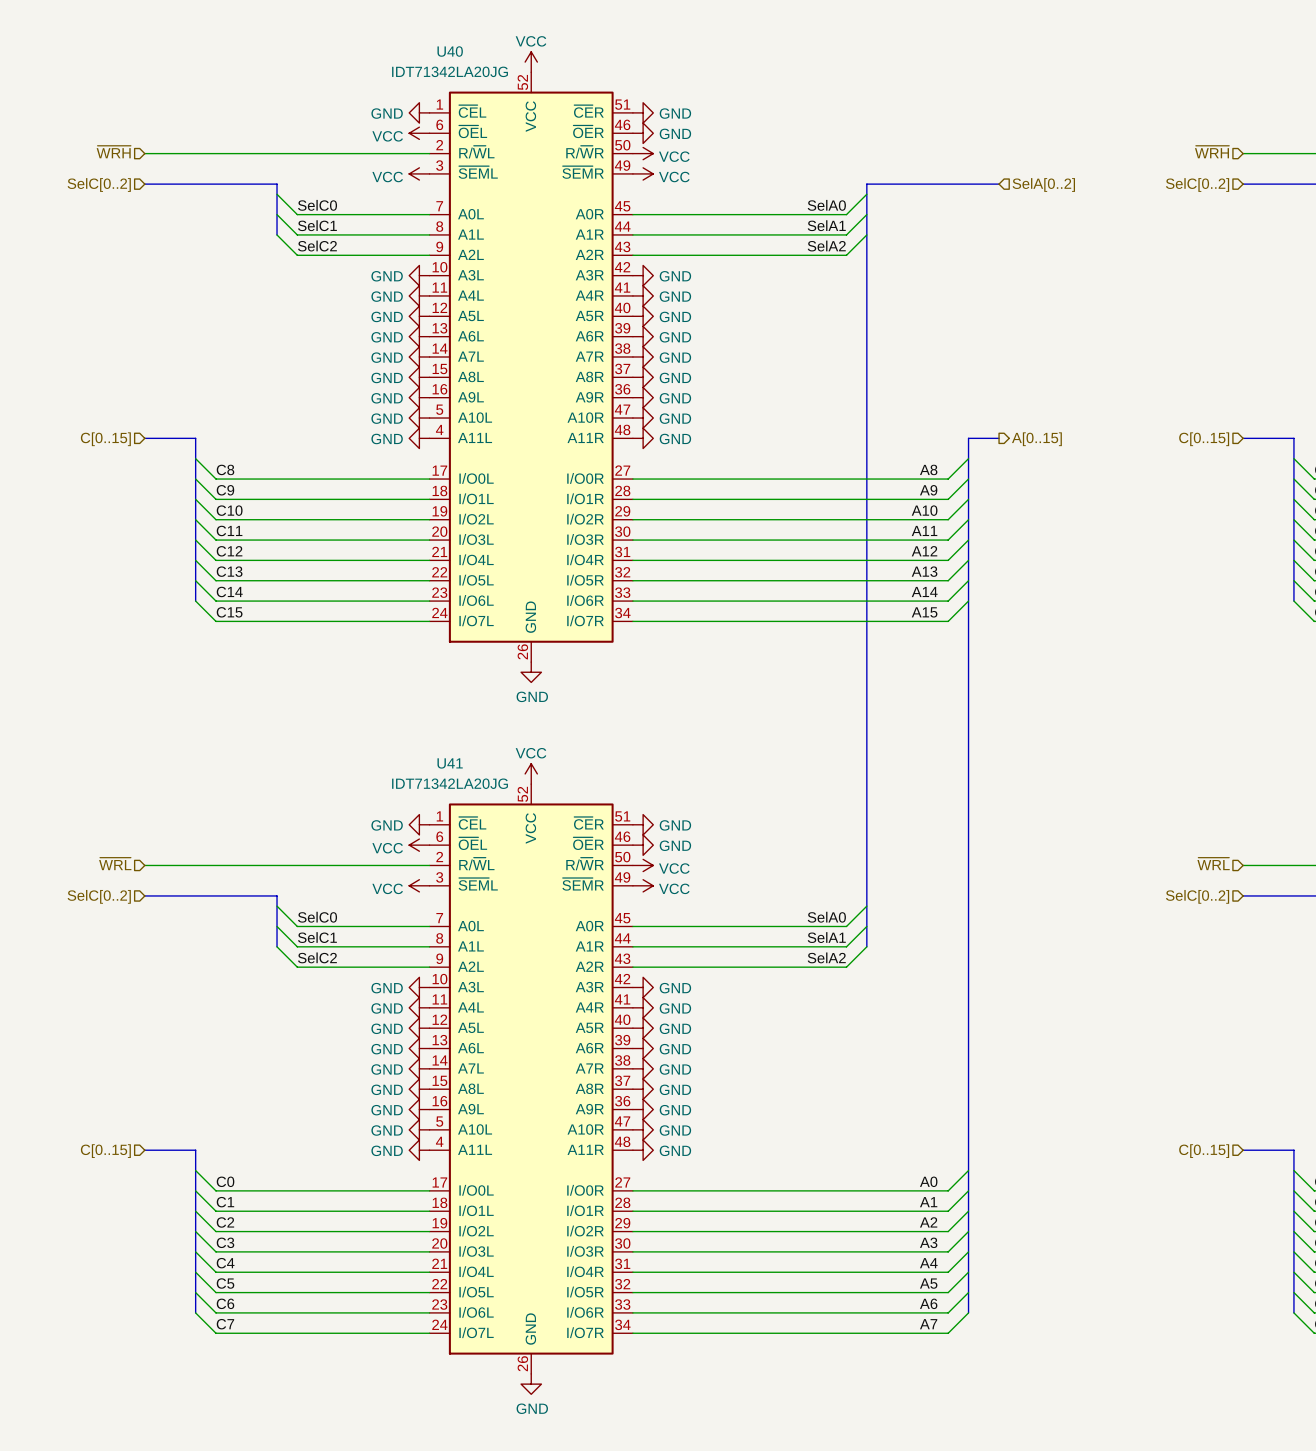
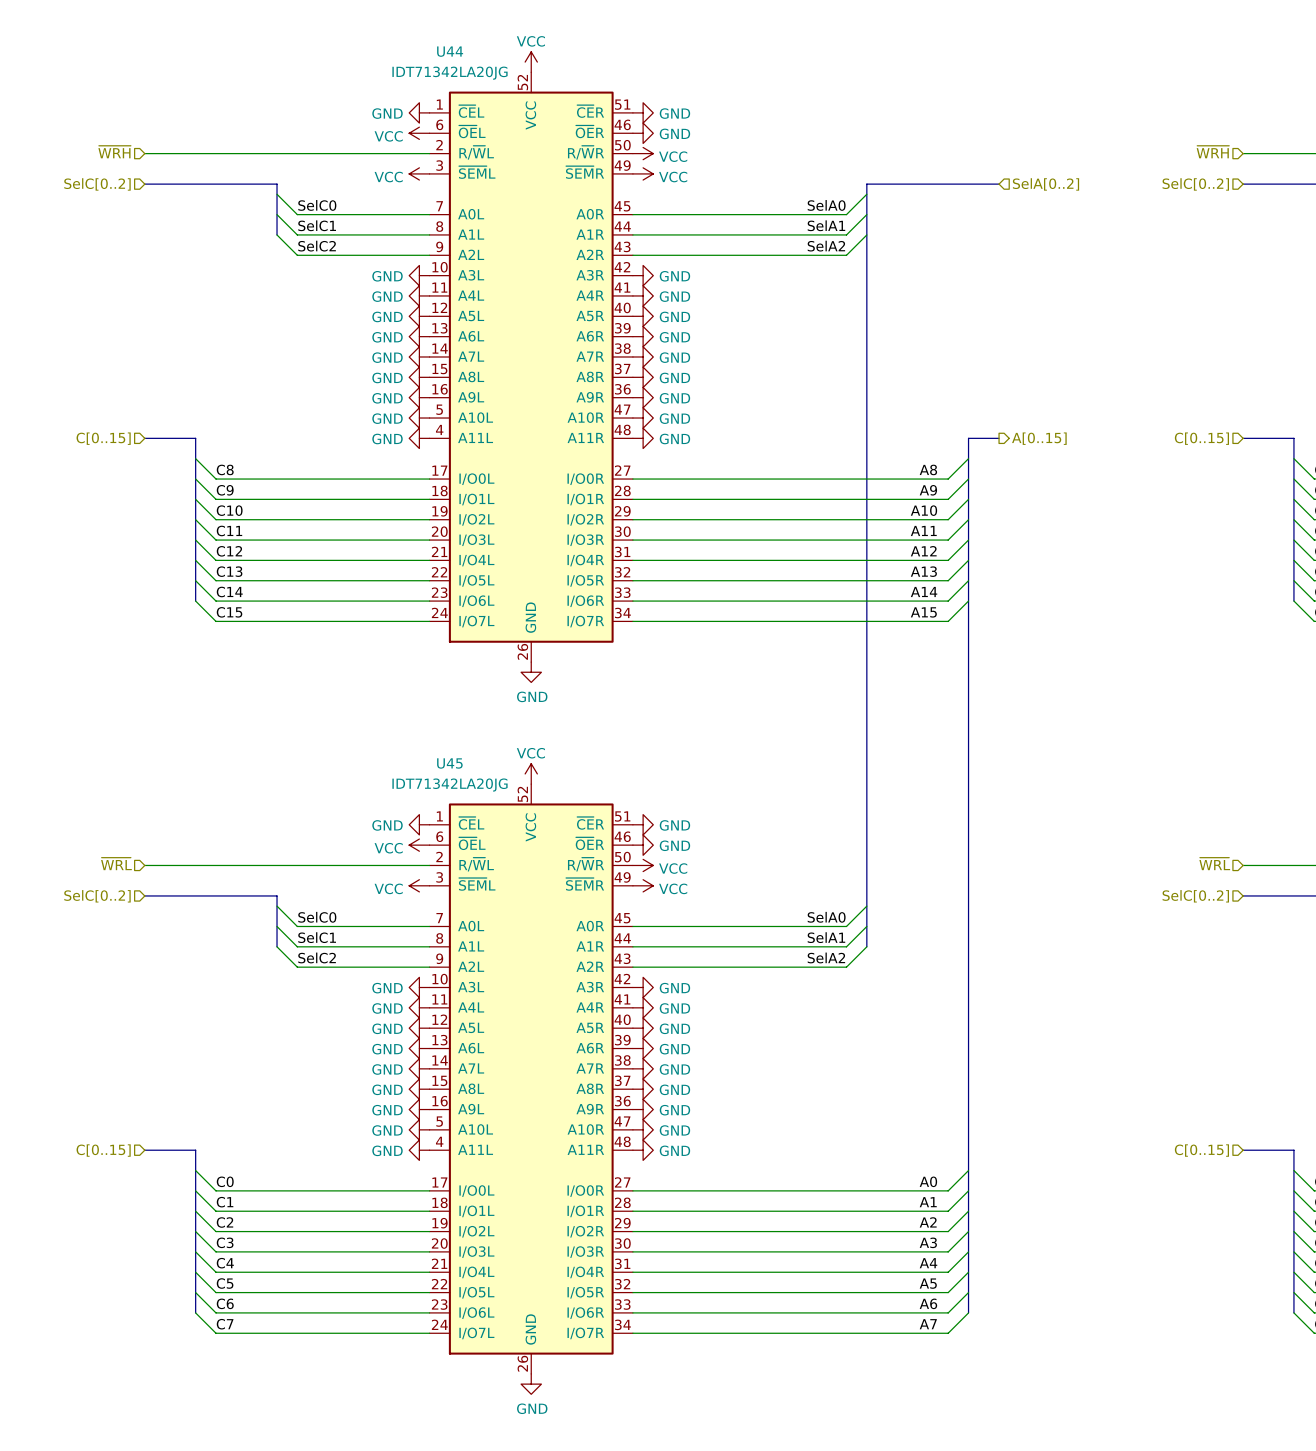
U40 name: U40 (450, 51) -> U44 (450, 51)
U41 name: U41 (450, 763) -> U45 (449, 763)

